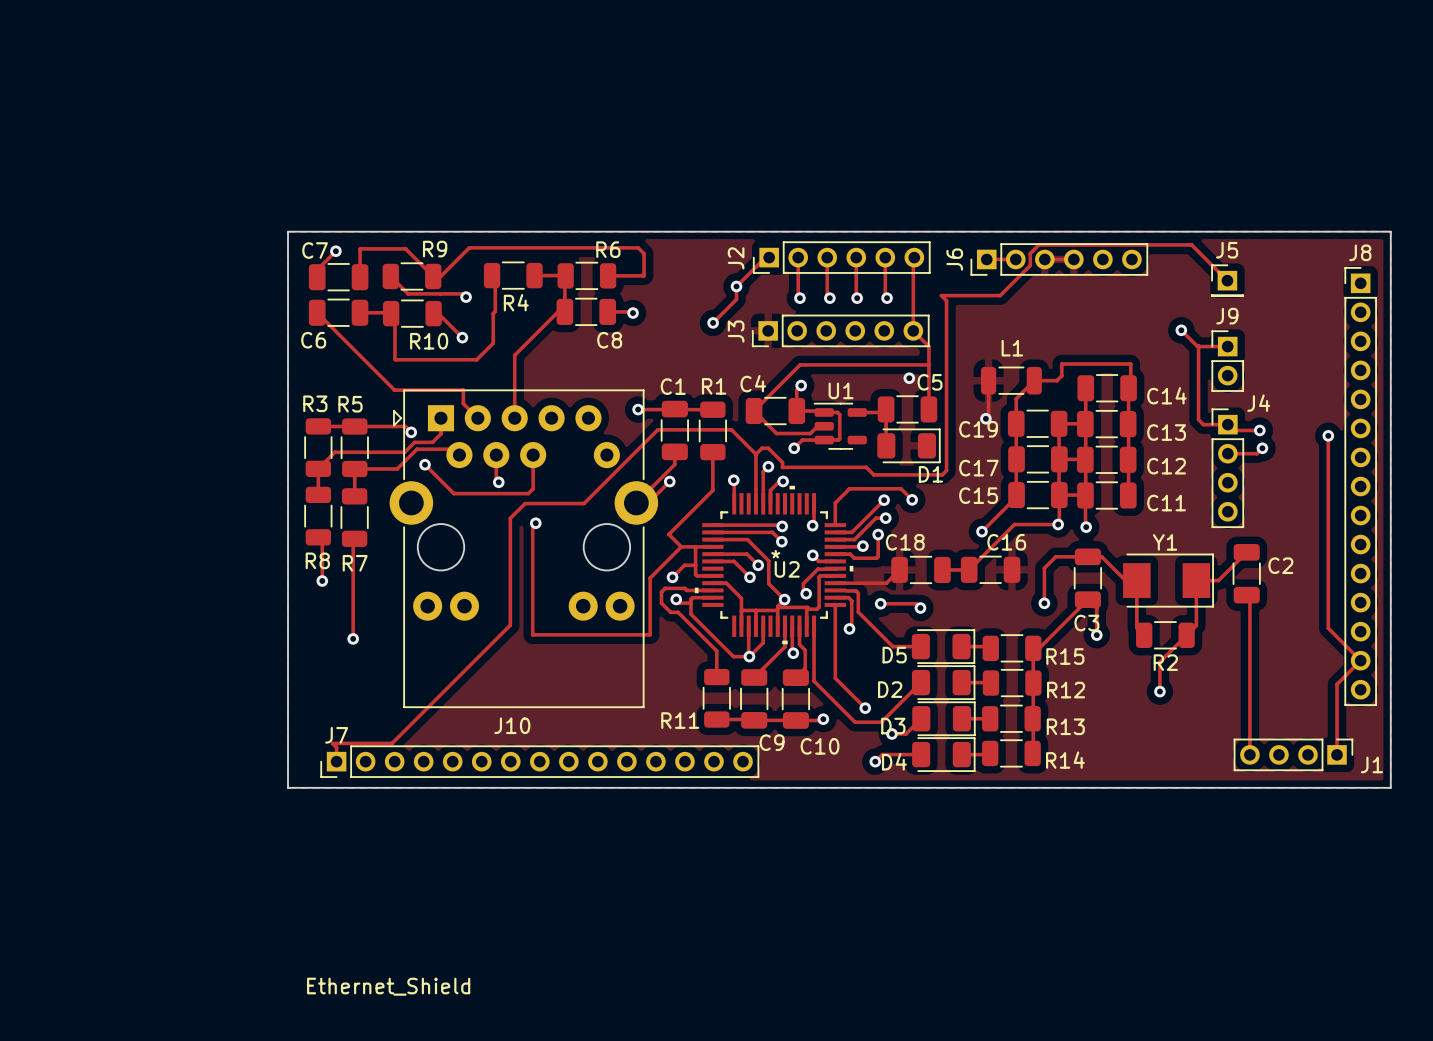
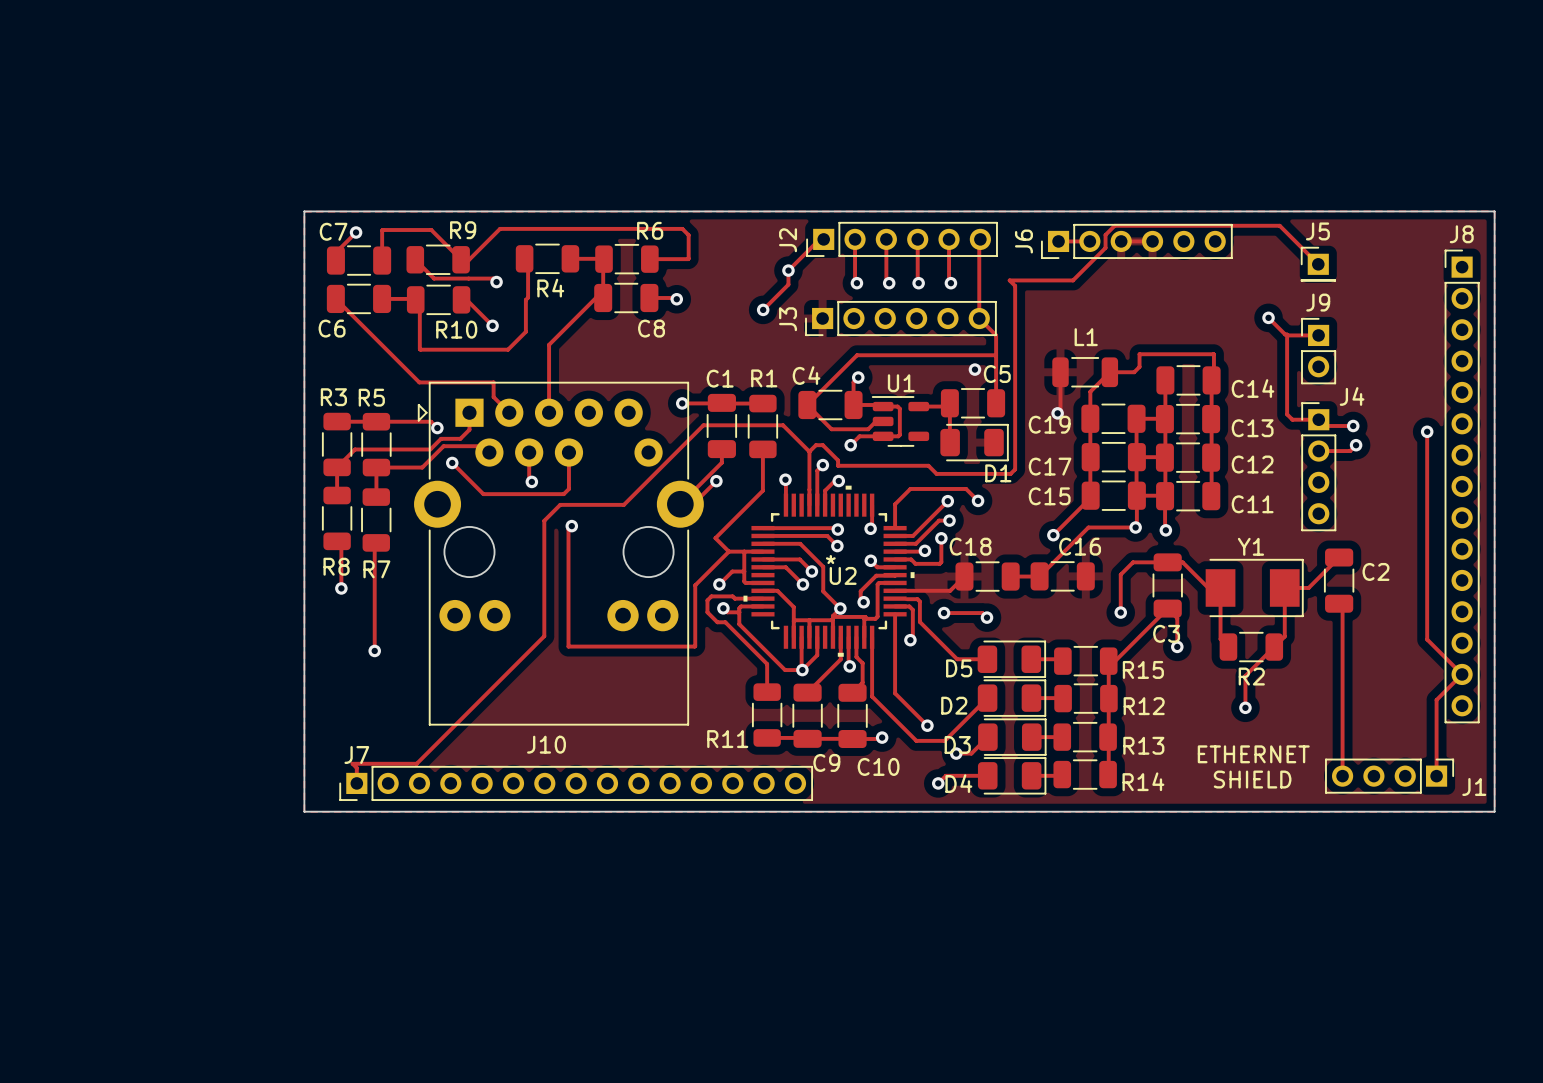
text: none -> ETHERNET (1253, 754)
text: none -> SHIELD (1252, 779)
text: Ethernet_Shield (388, 986) -> none

